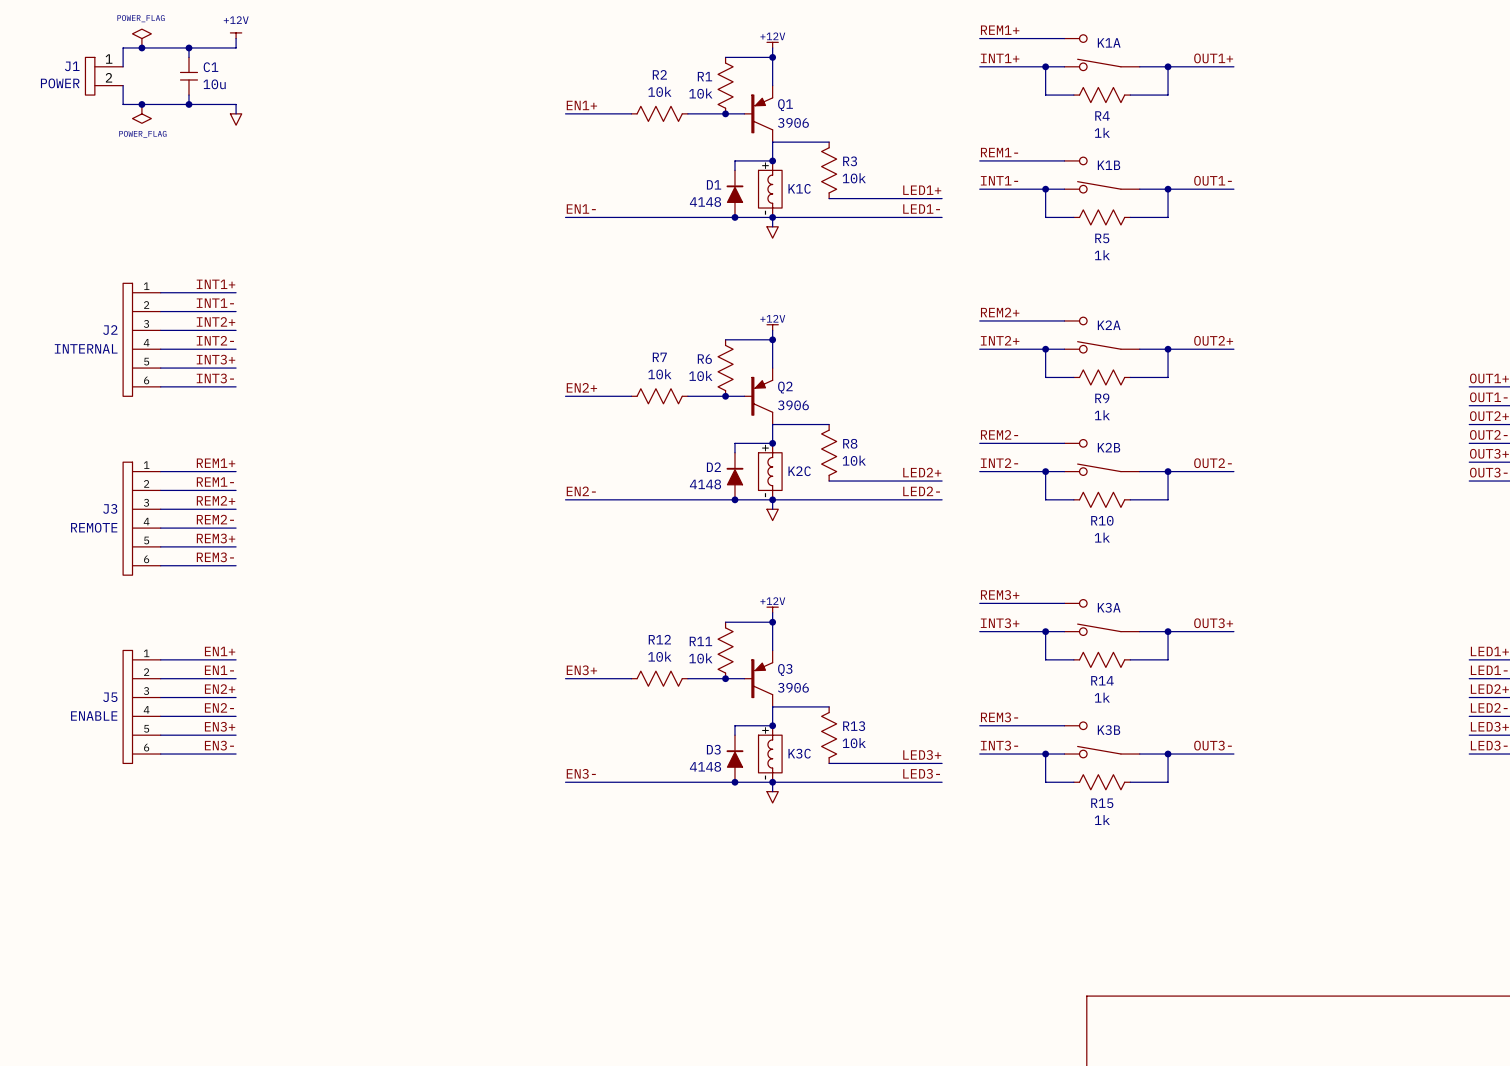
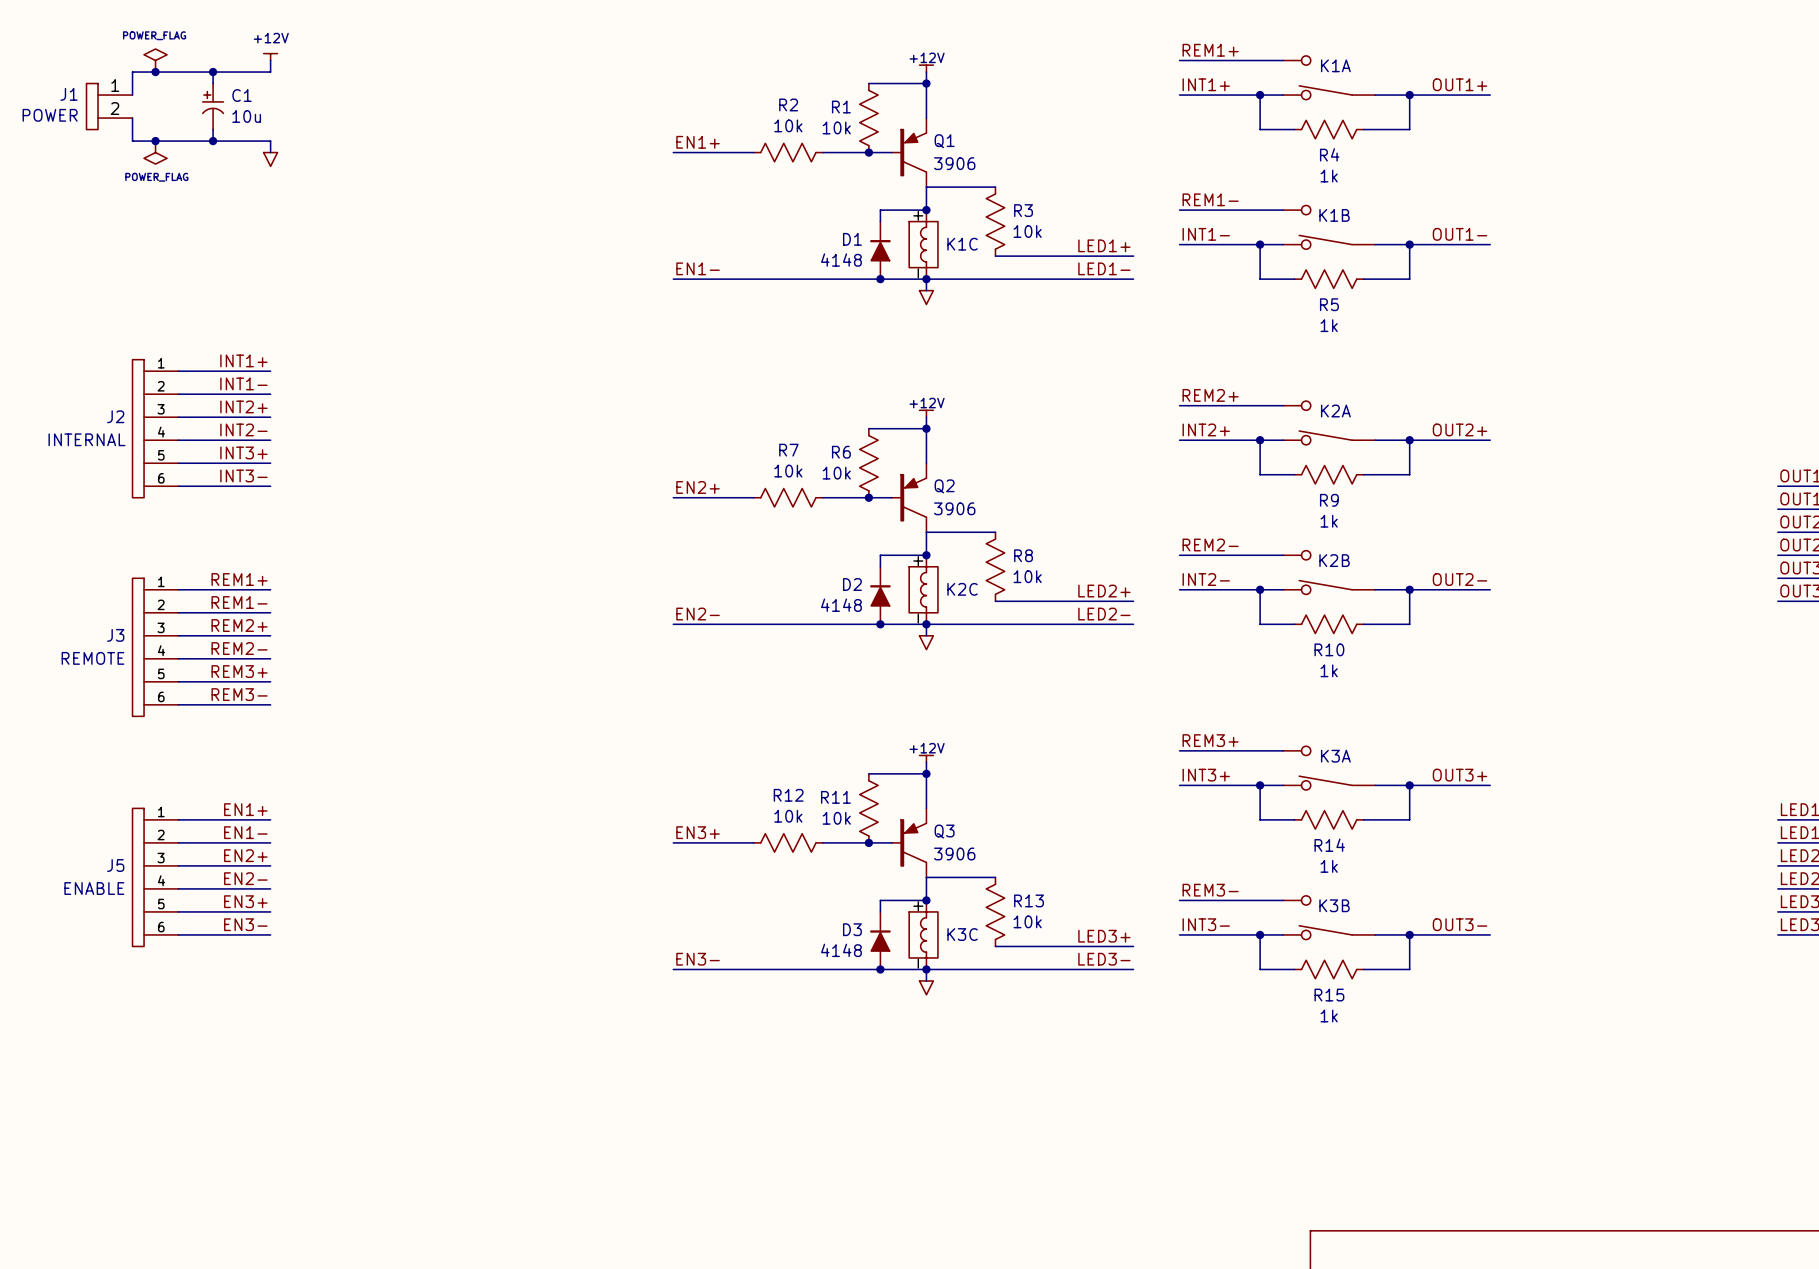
C1 symbol: [180, 57, 198, 96] -> [202, 83, 224, 130]

